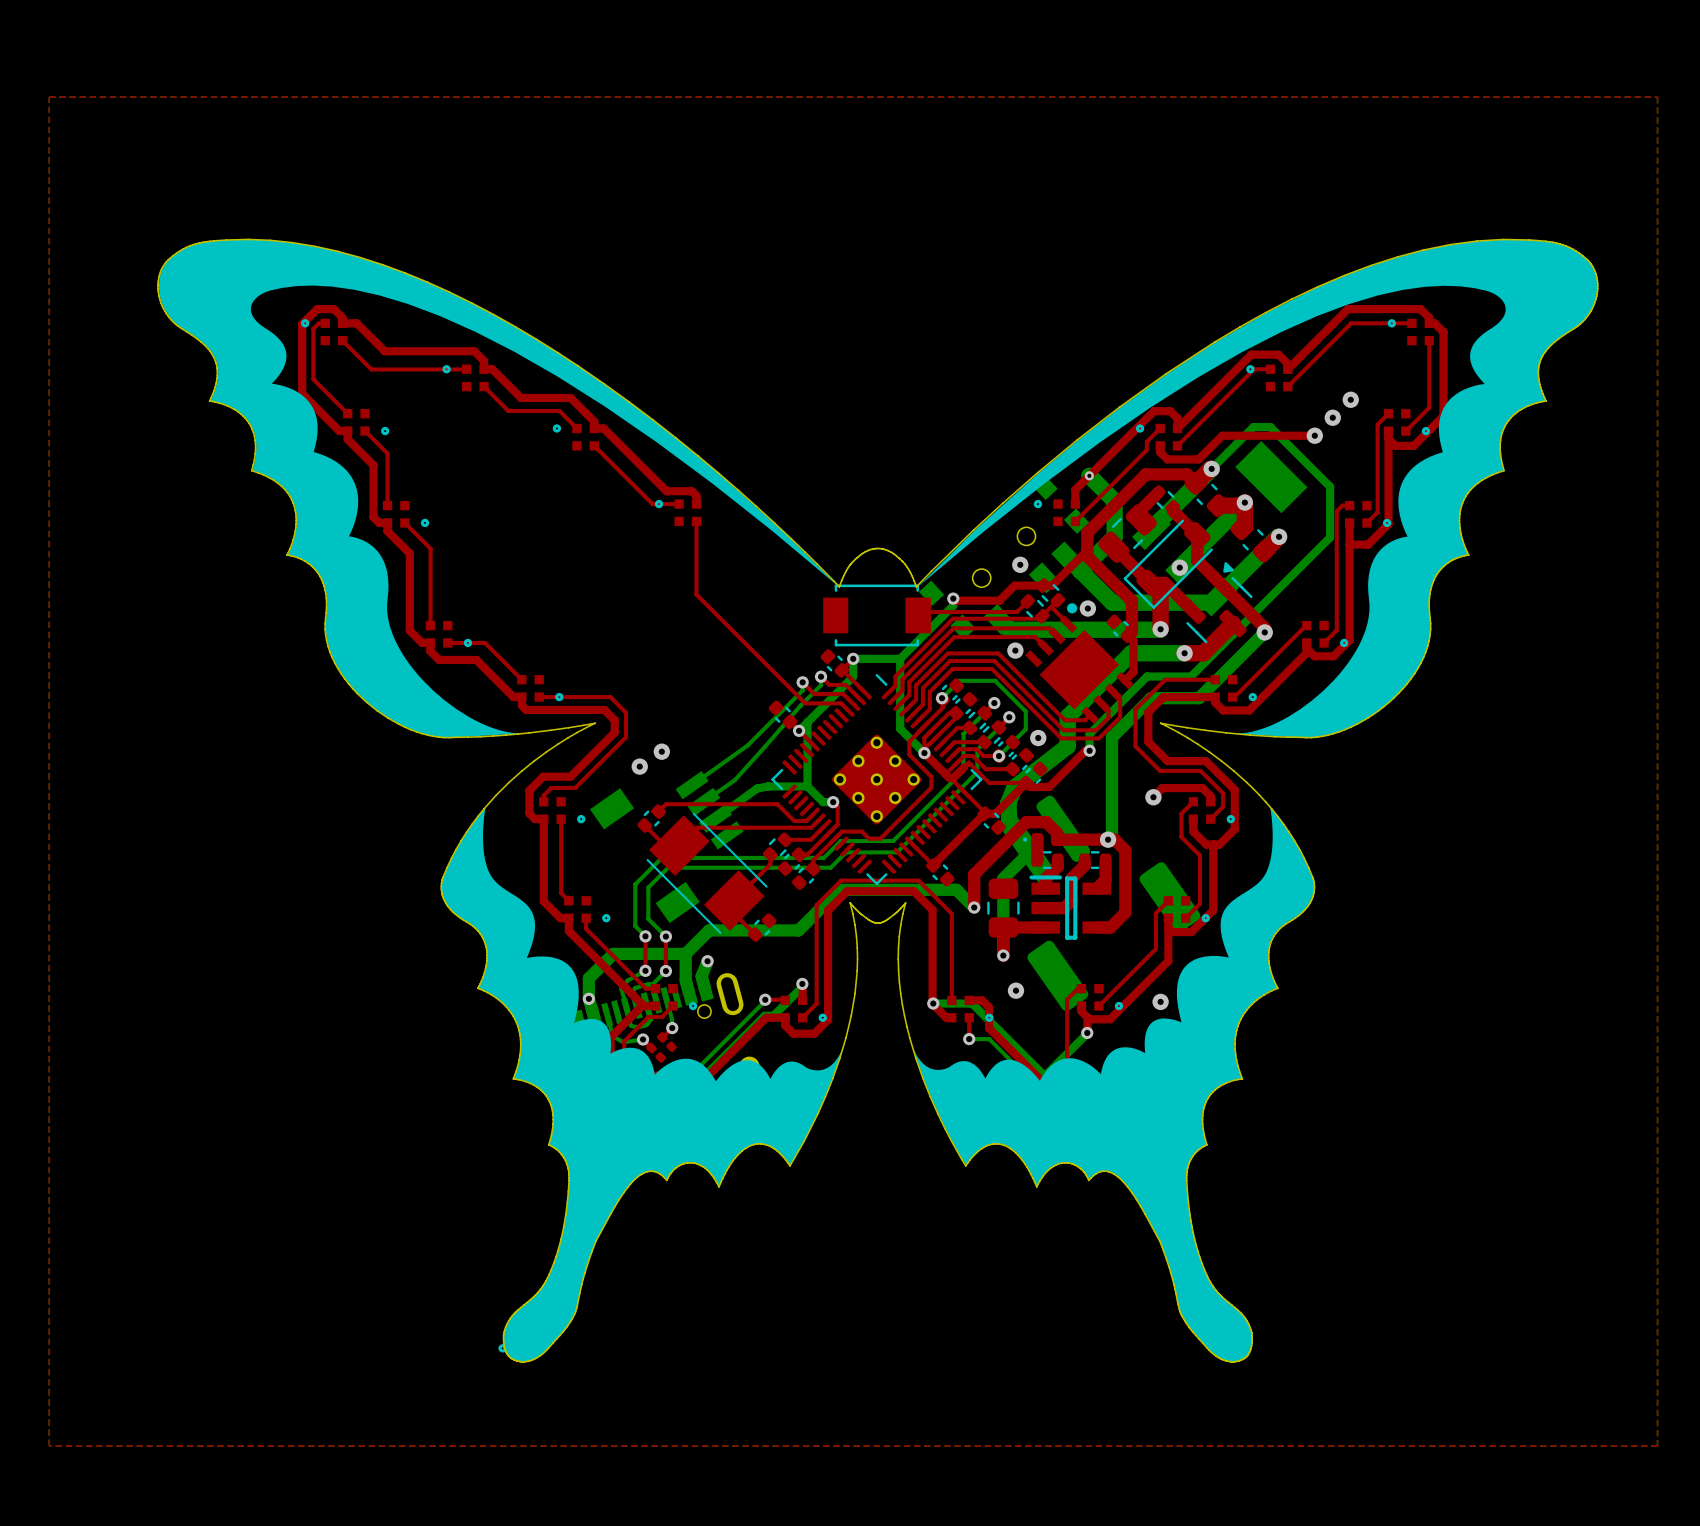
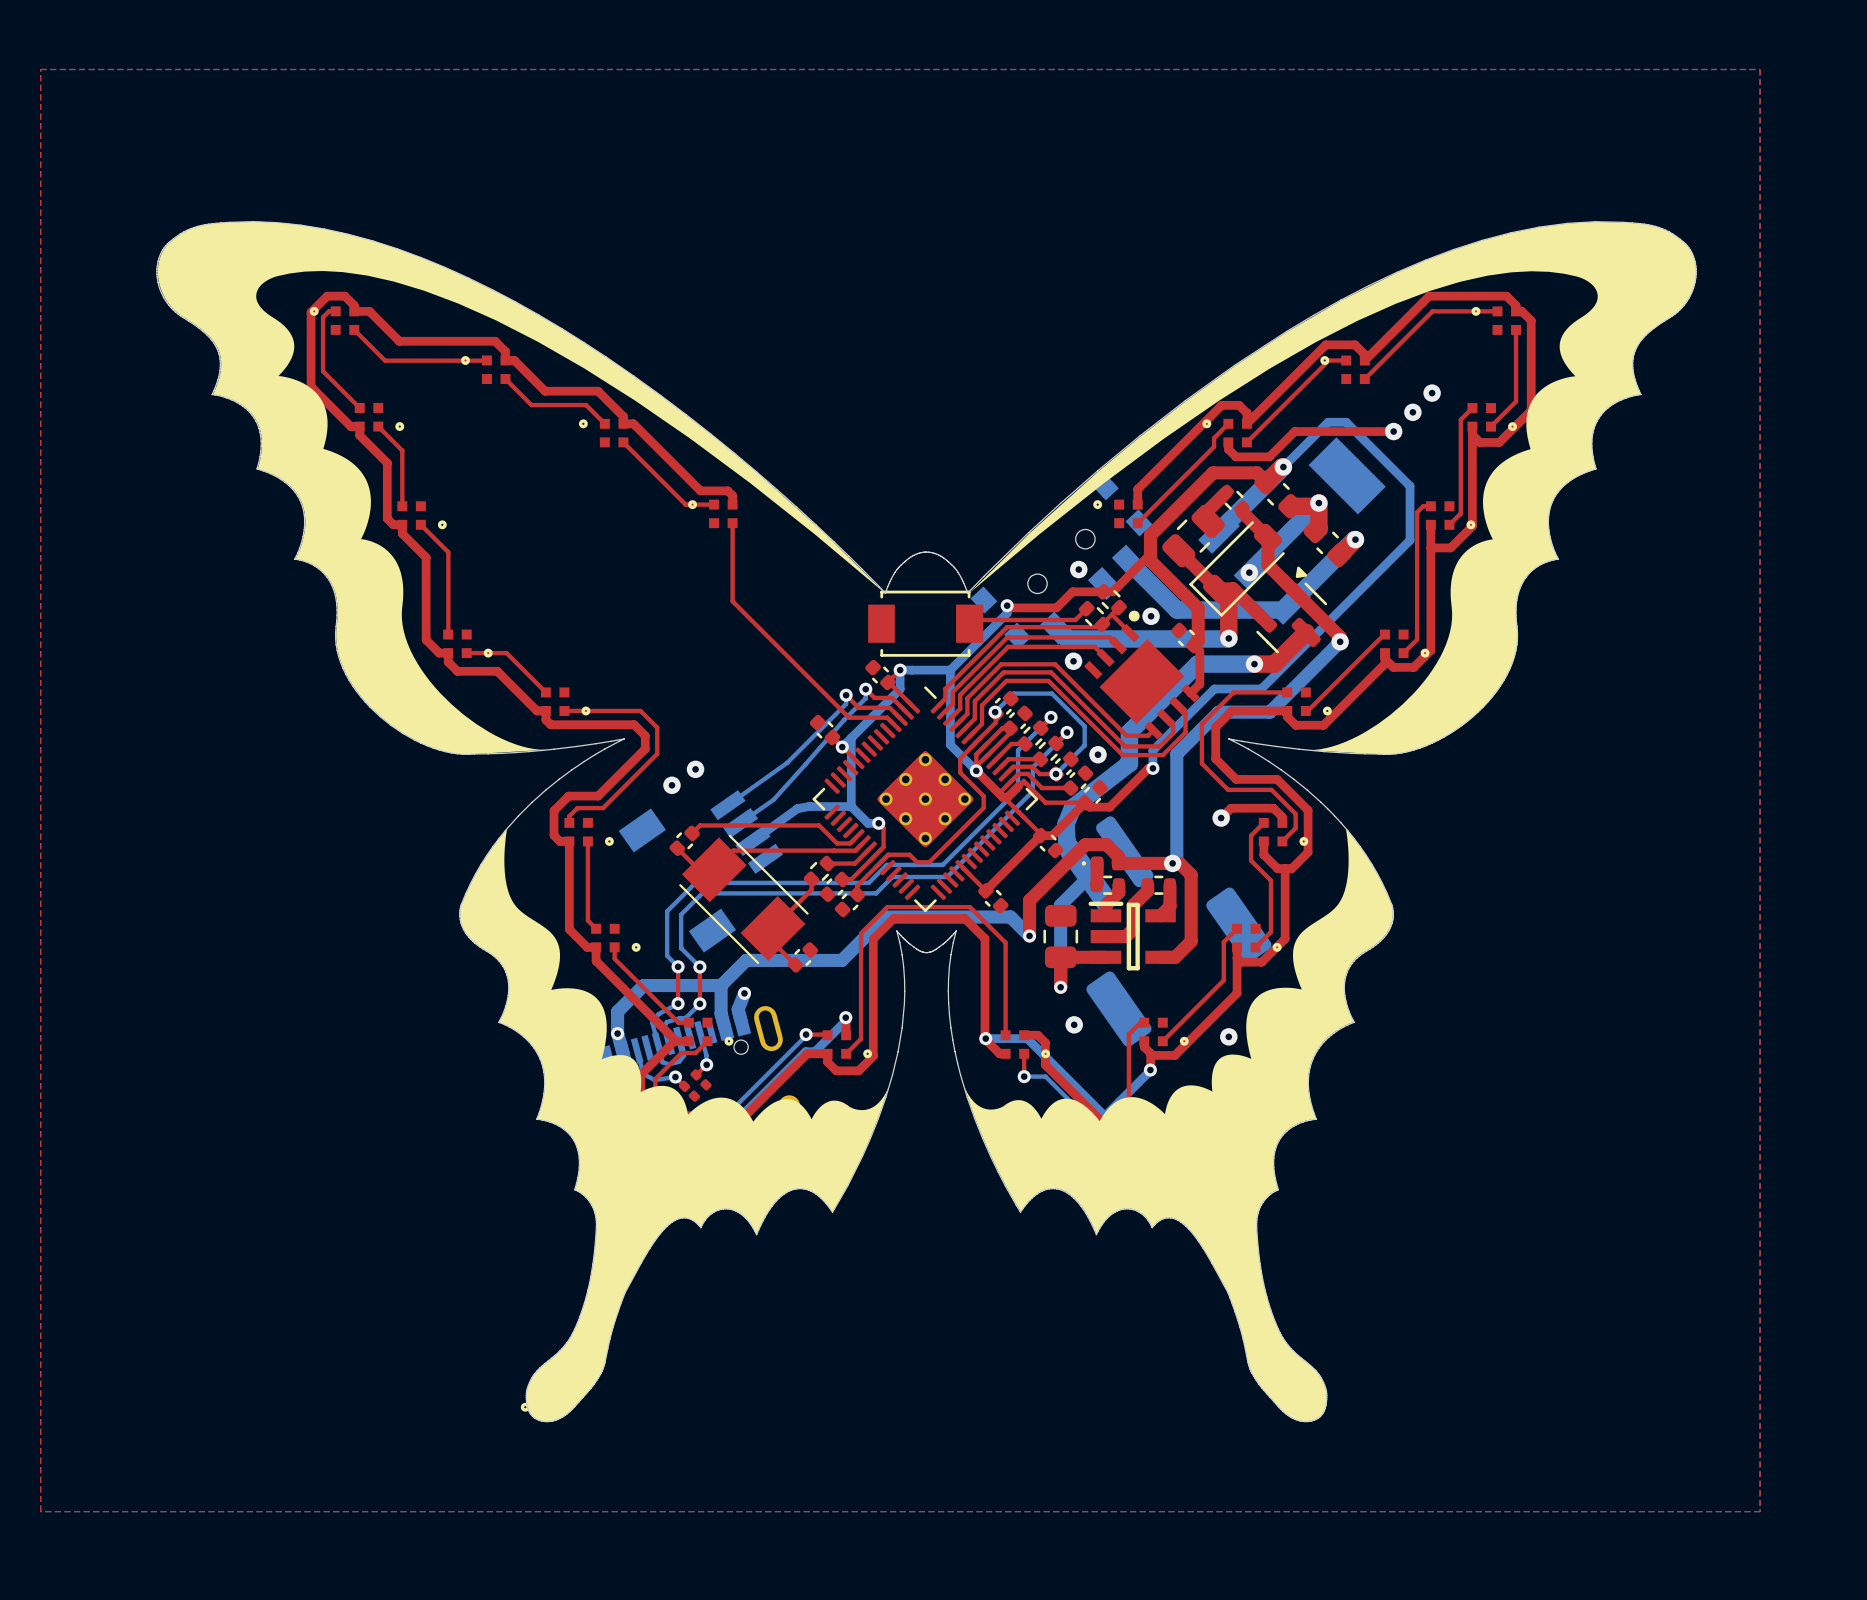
bottom track: (1089, 475) (1114, 501) (1114, 536) (1080, 570) -> none
via: (1089, 475) -> none

